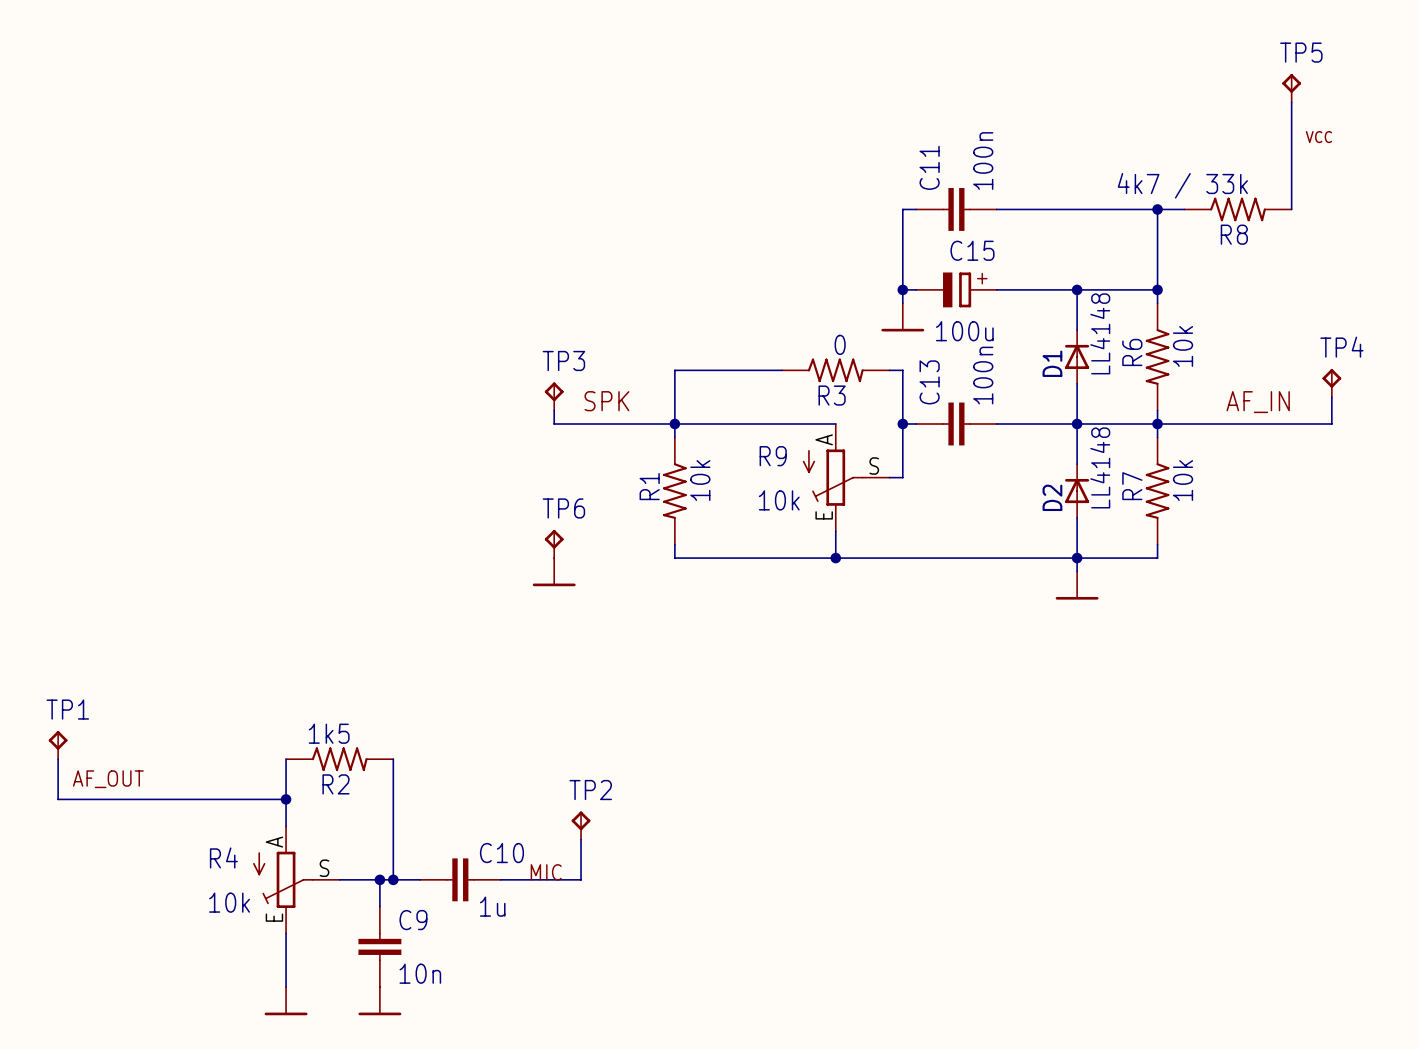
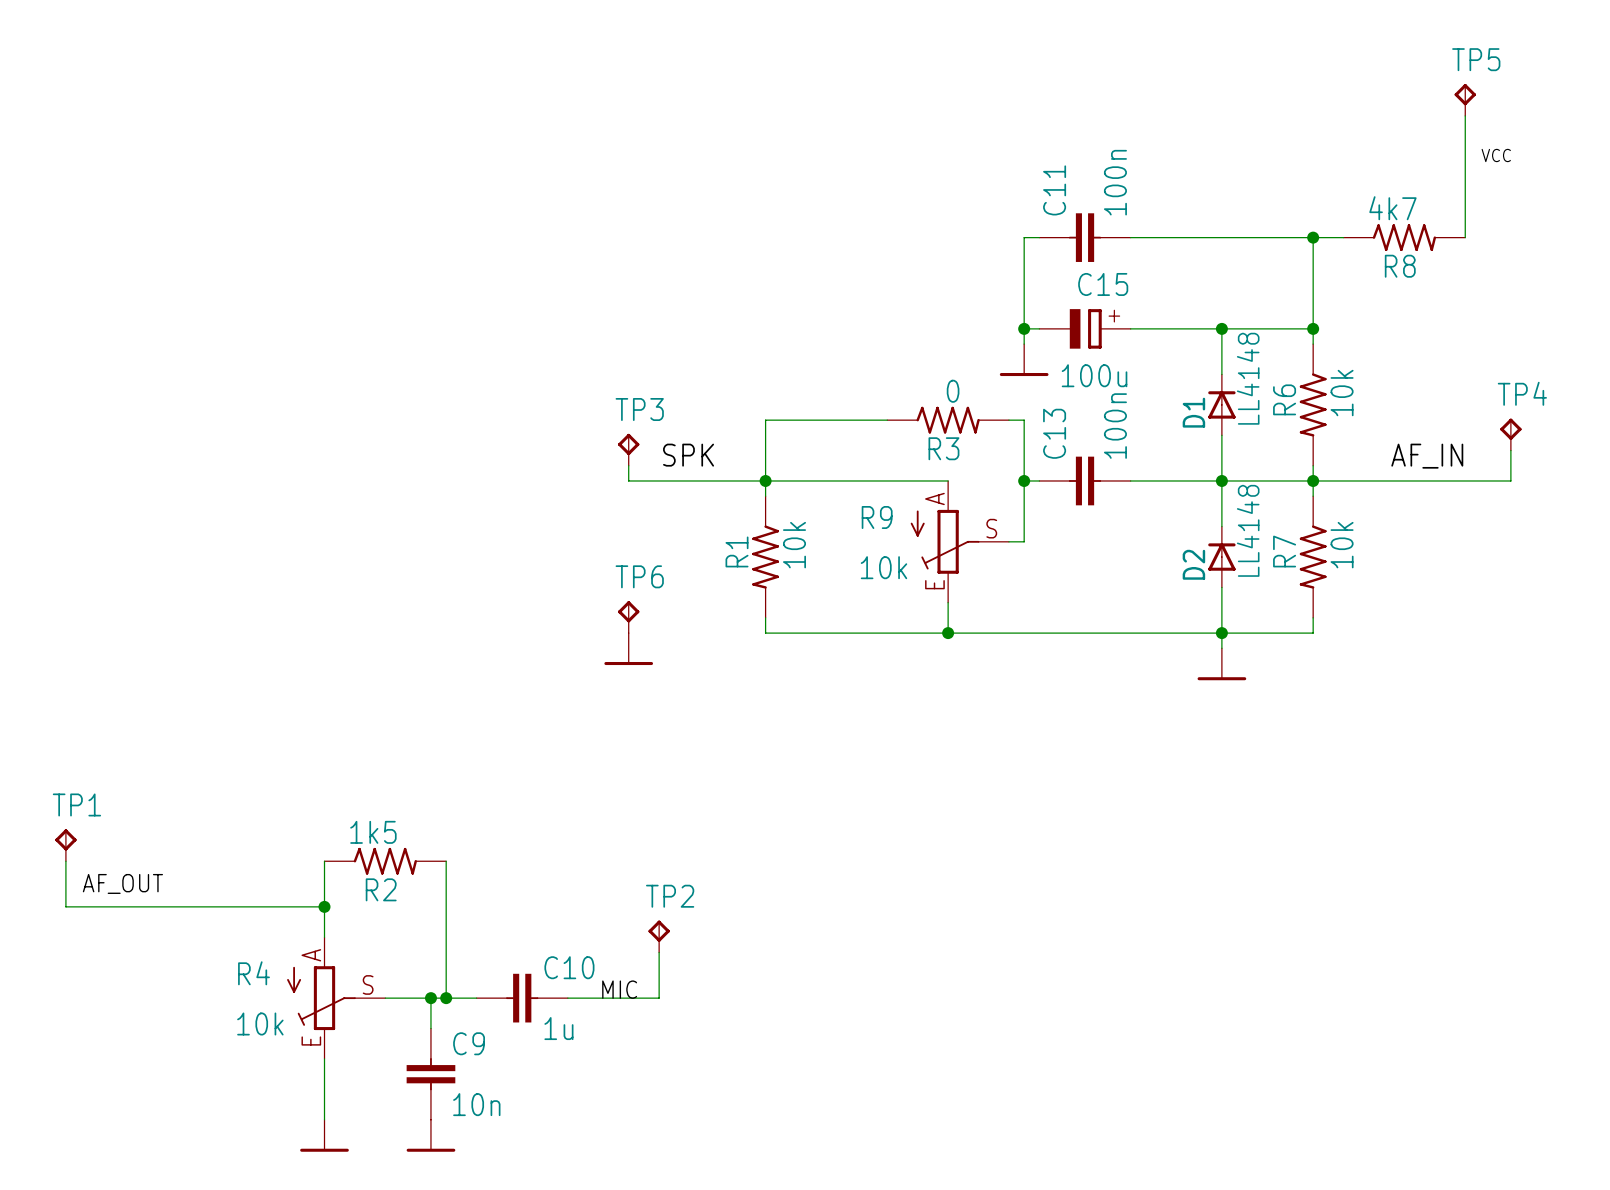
R8 value: 4k7 / 33k (1182, 185) -> 4k7 (1392, 208)

